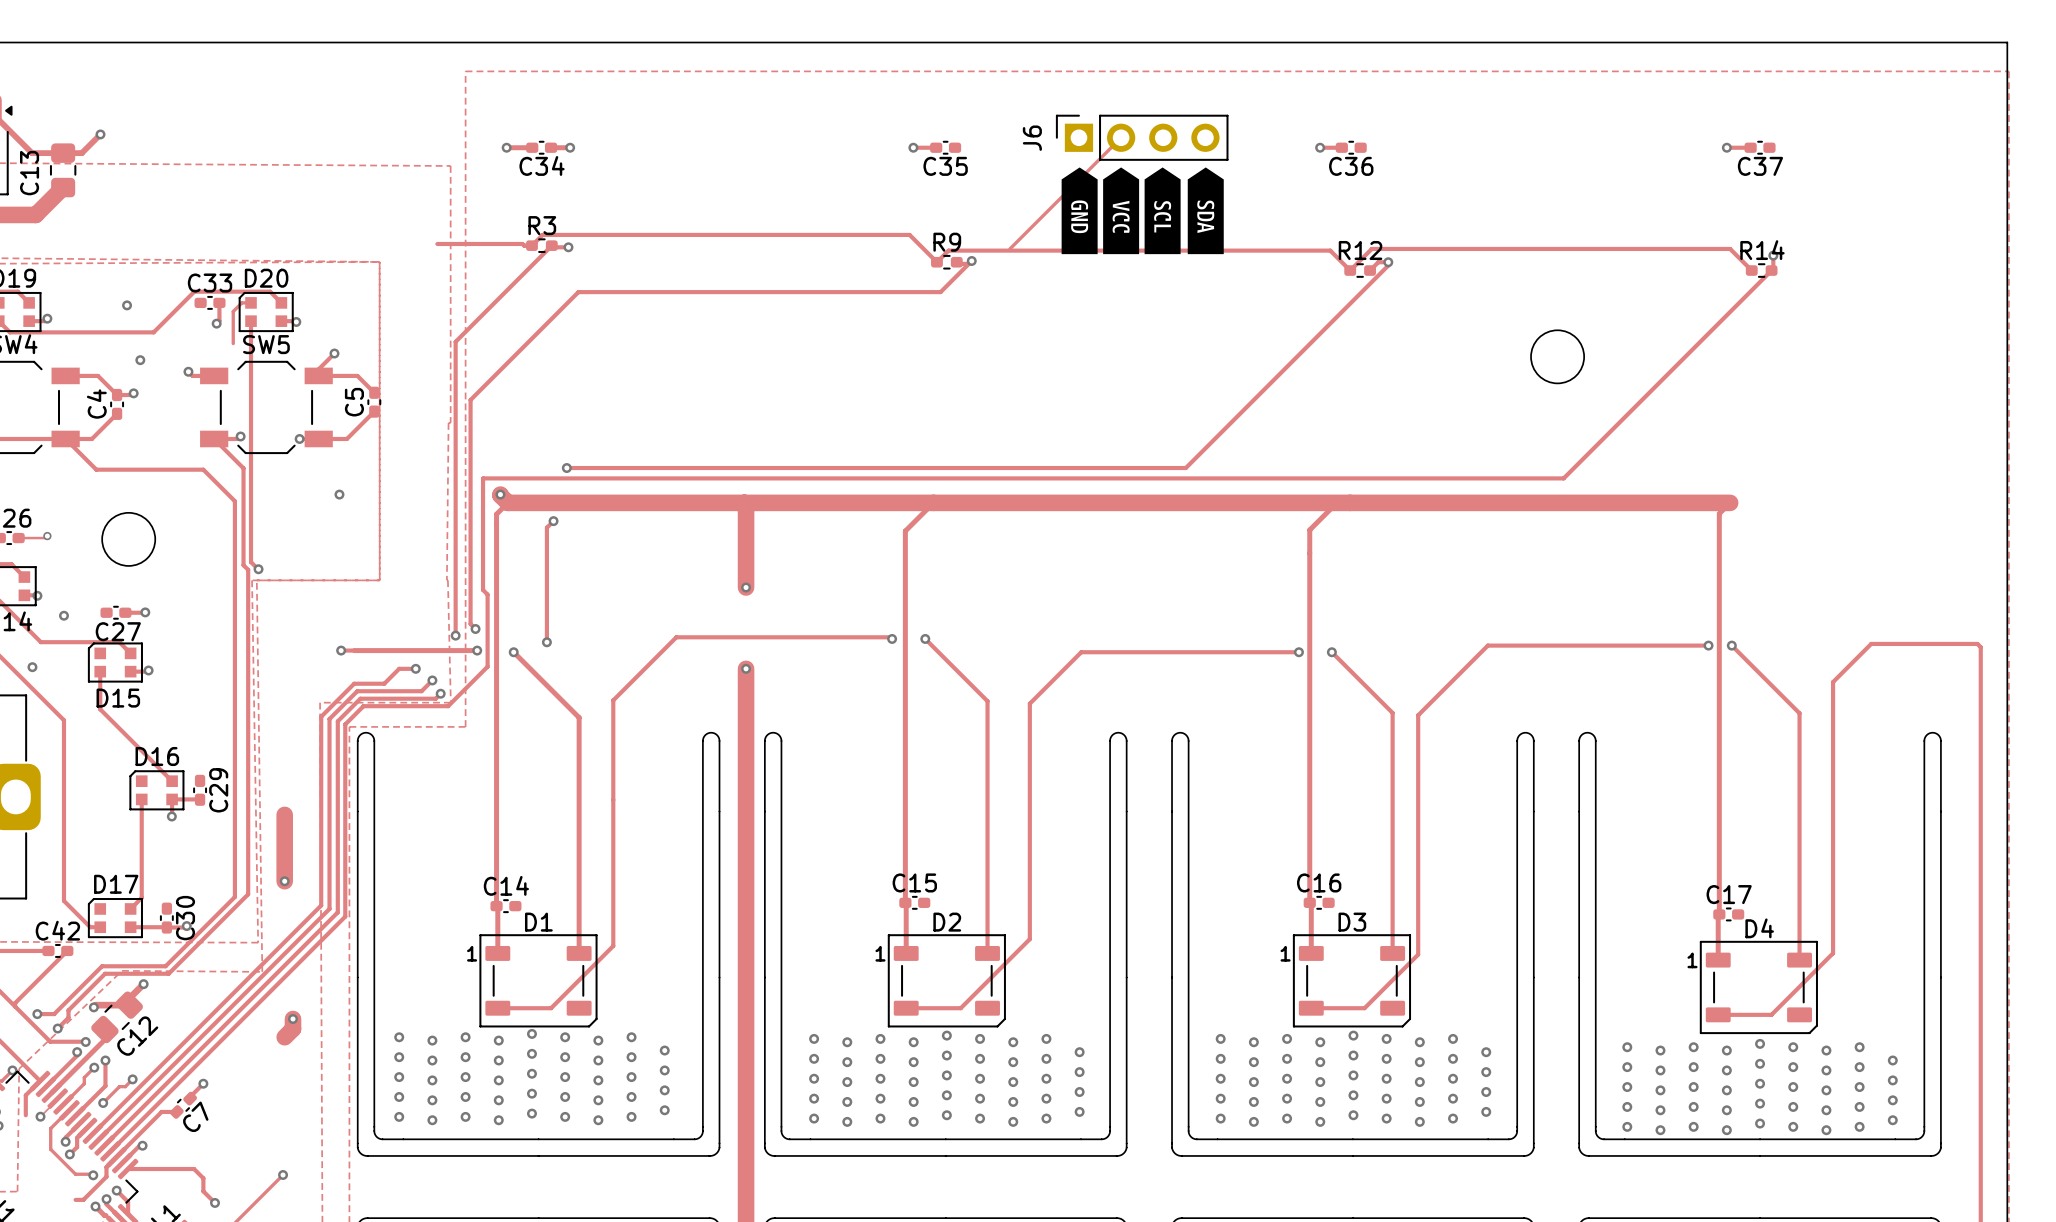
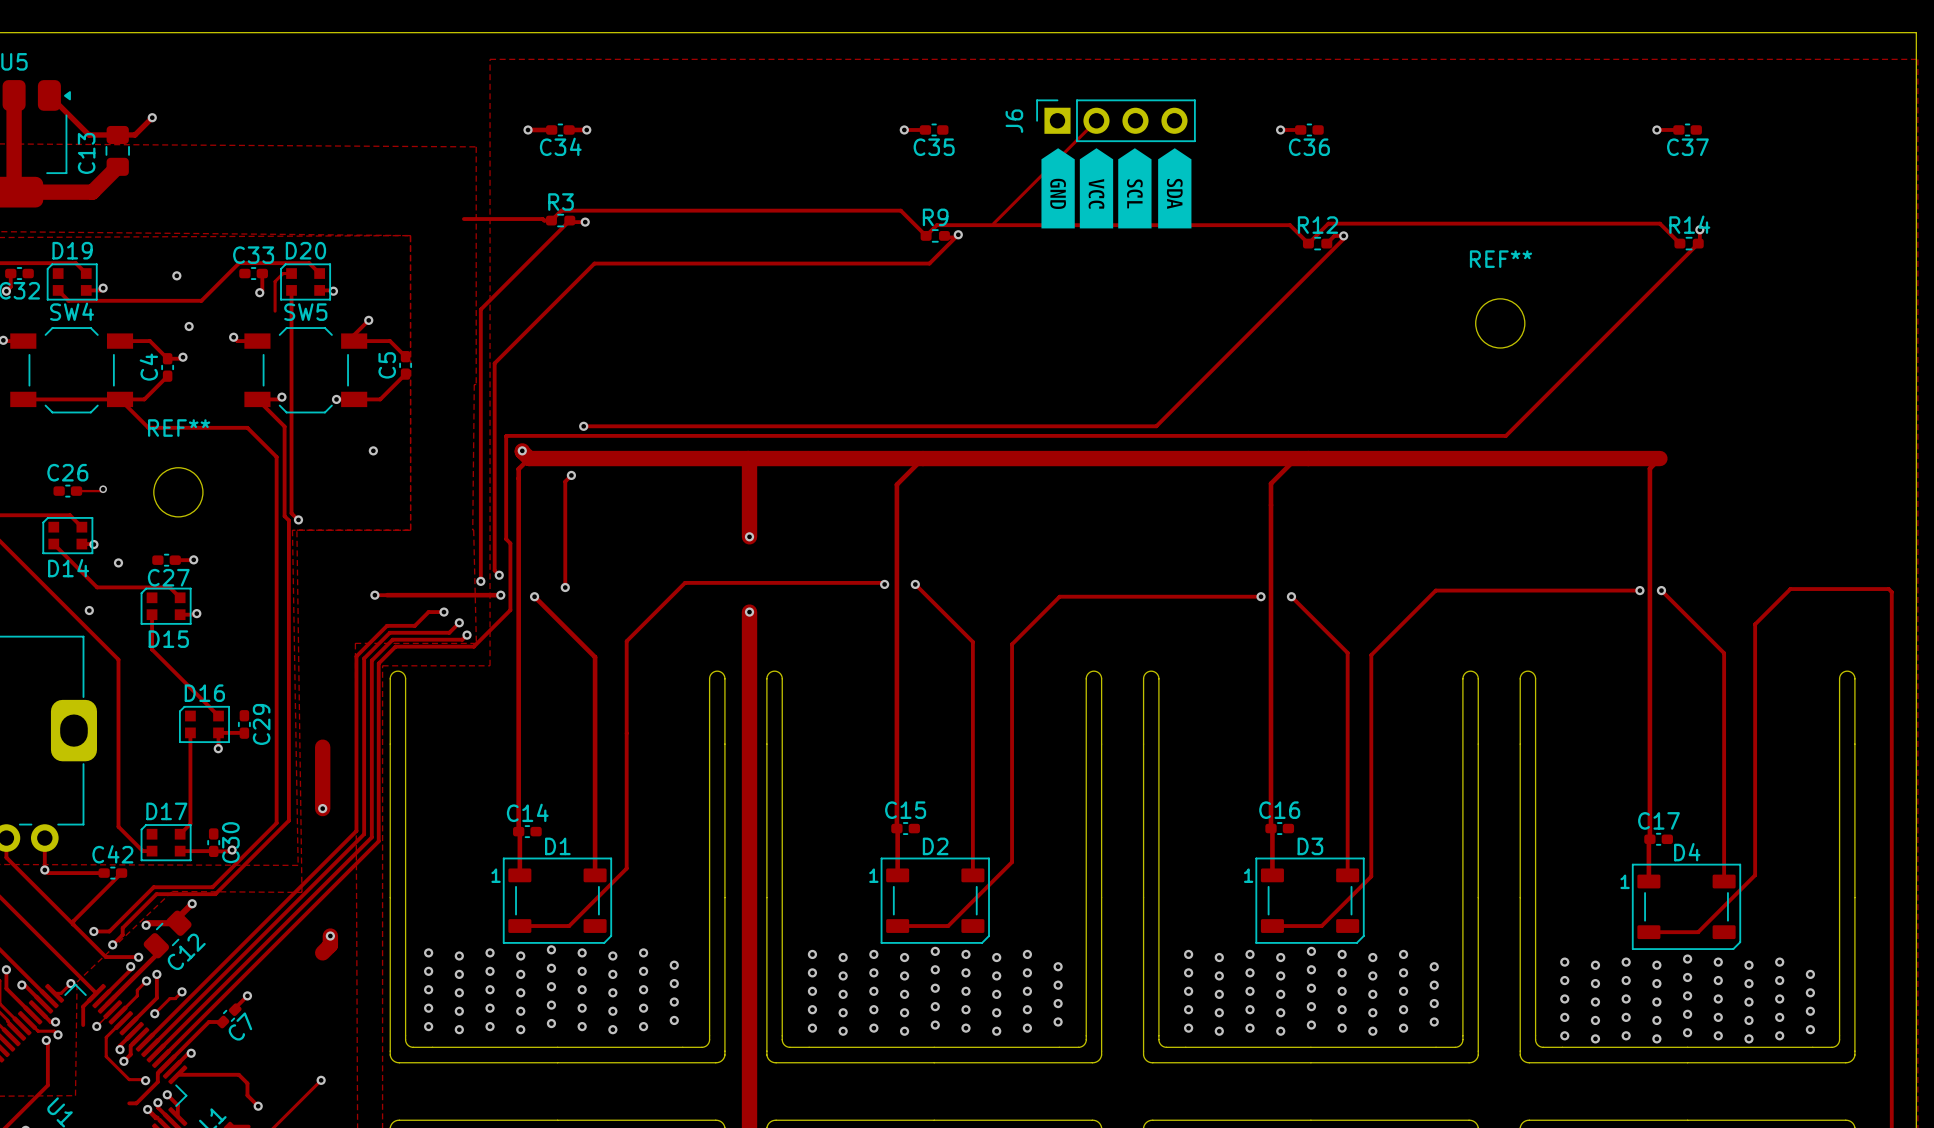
REF** name: none -> REF** (1501, 259)
REF** name: none -> REF** (179, 428)

